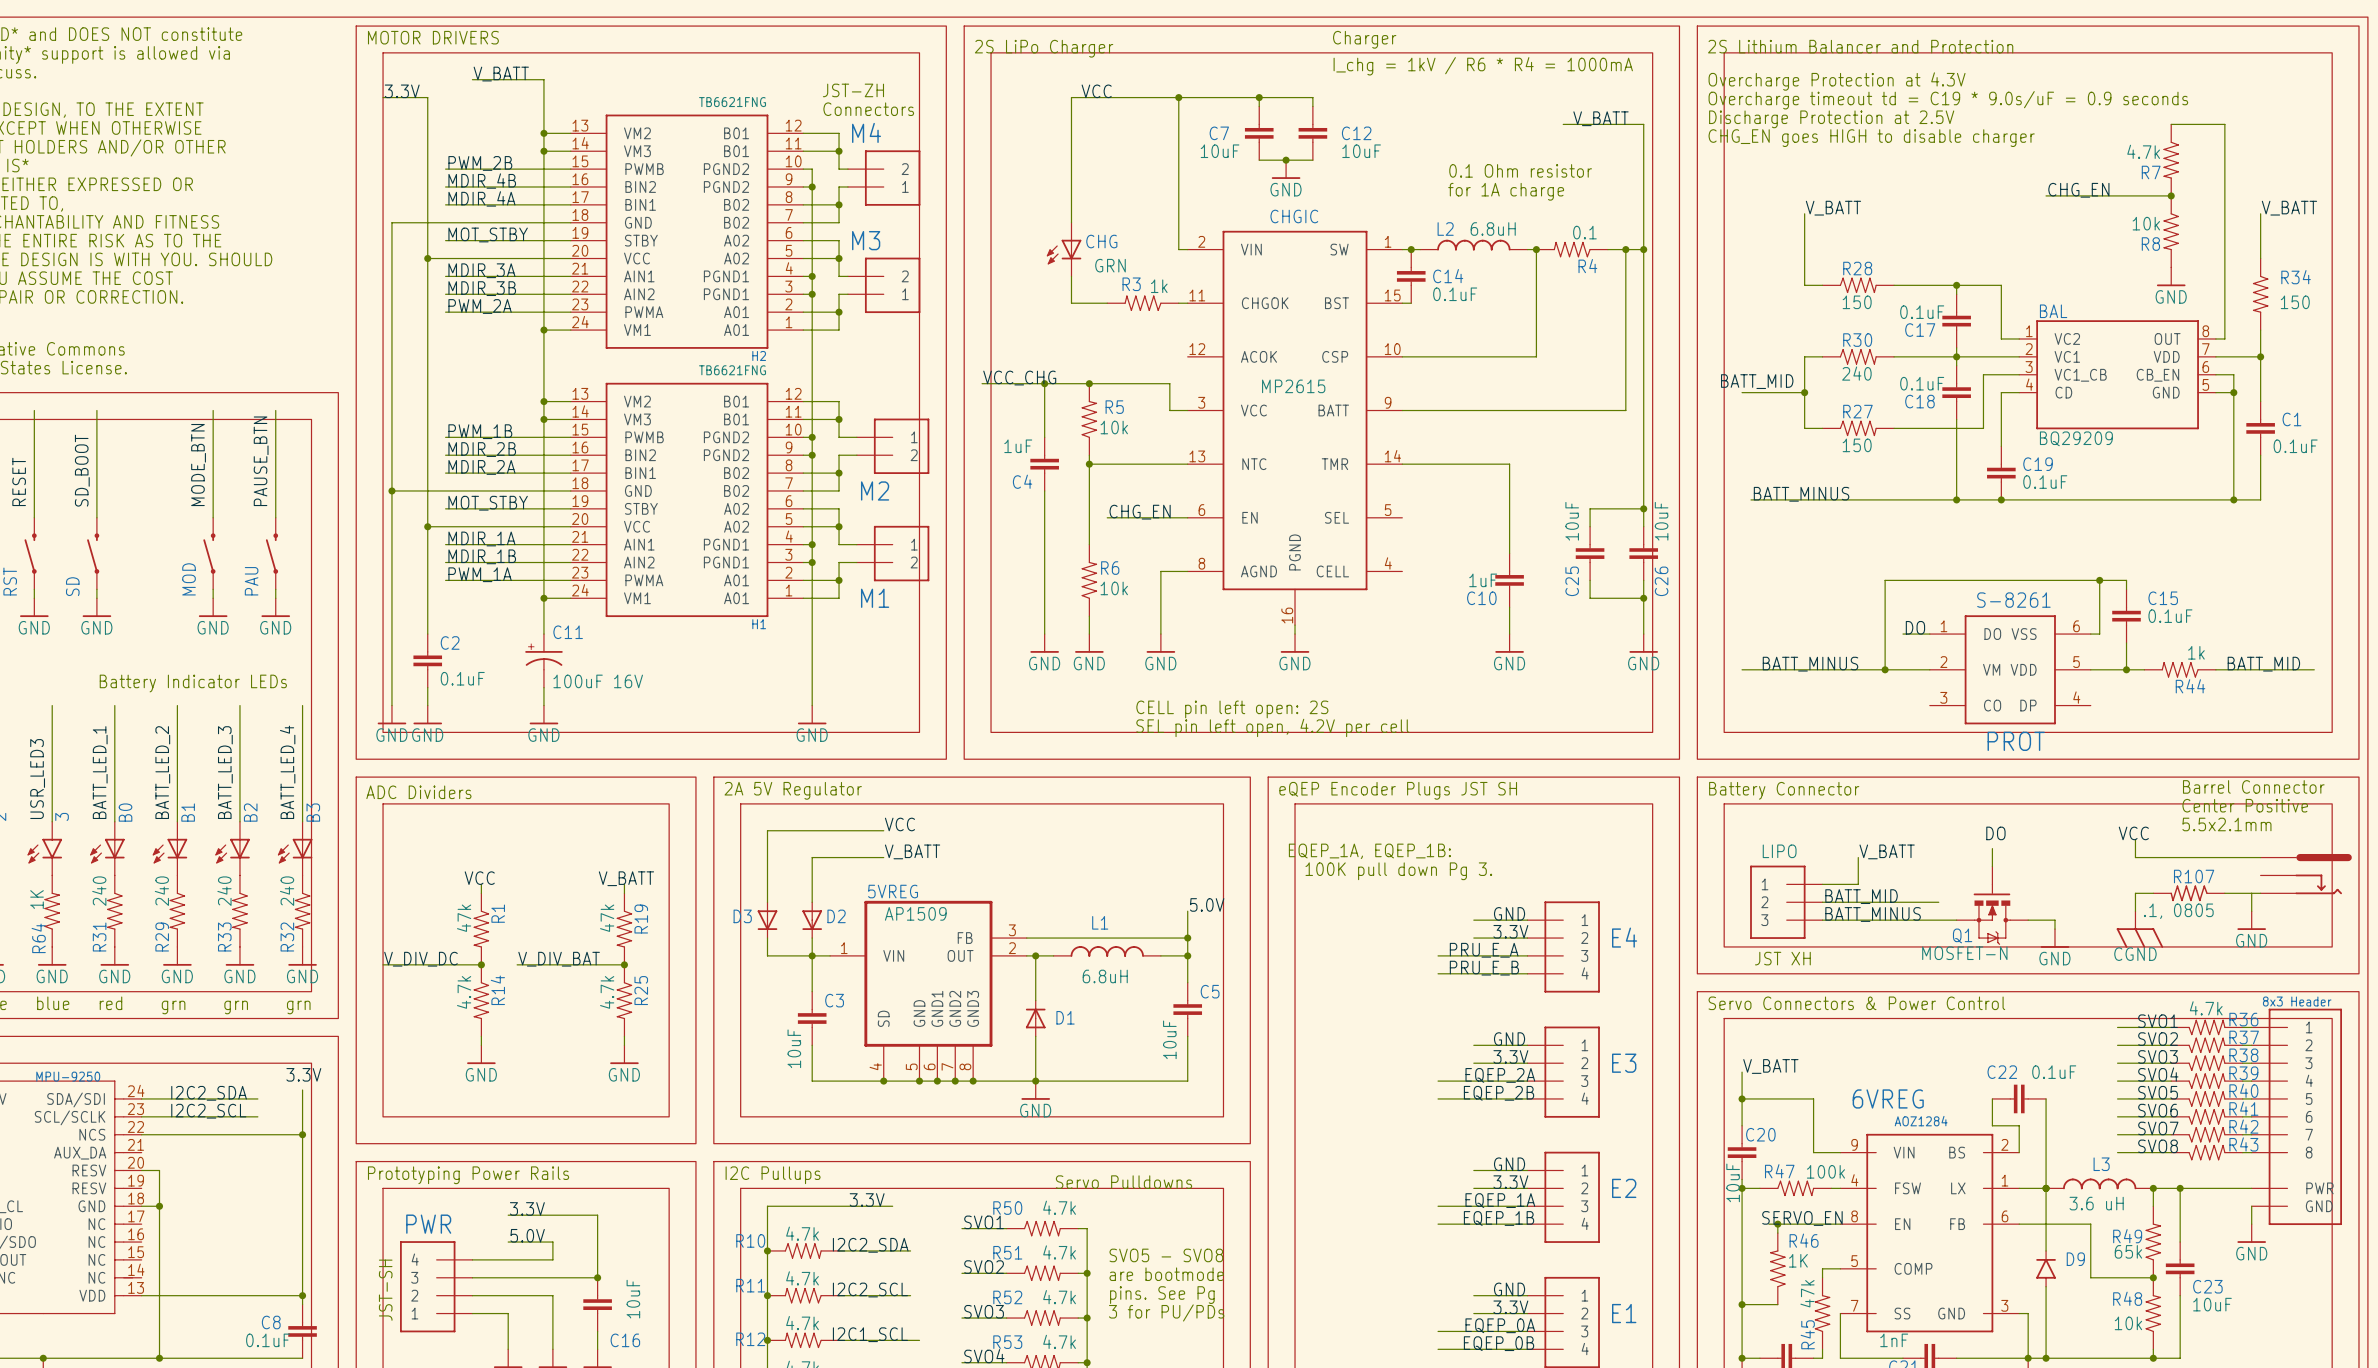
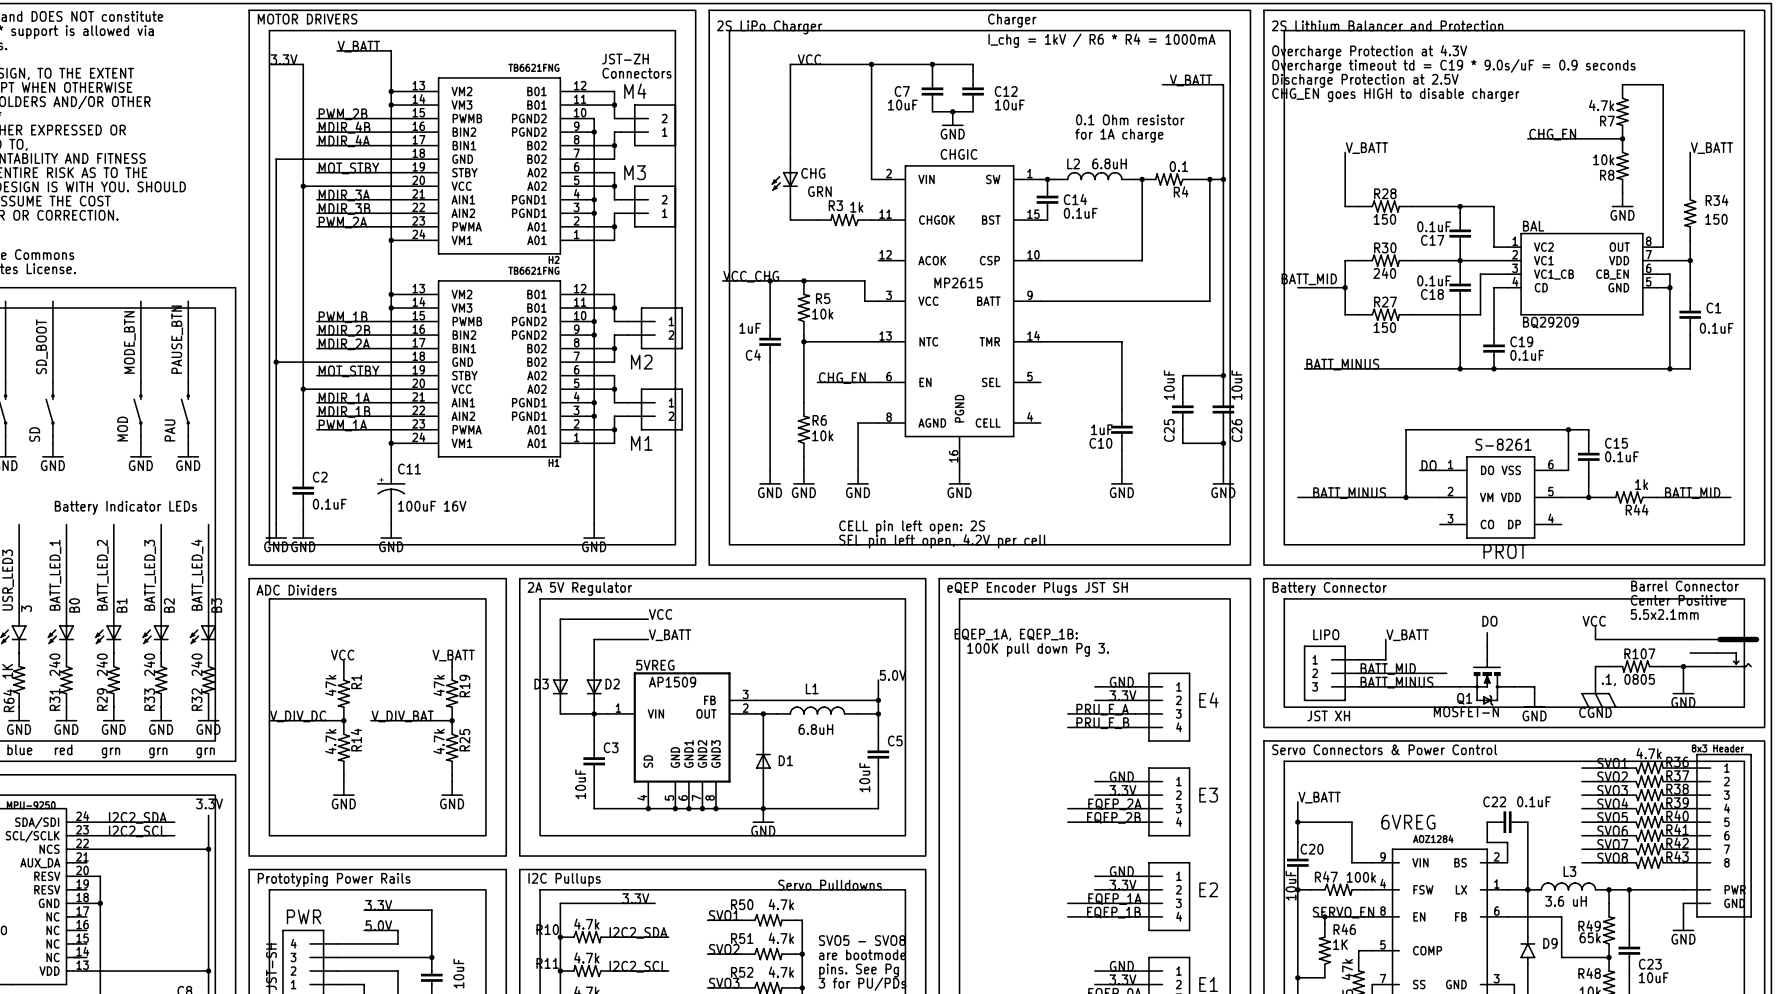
junction: none -> (1683, 666)

